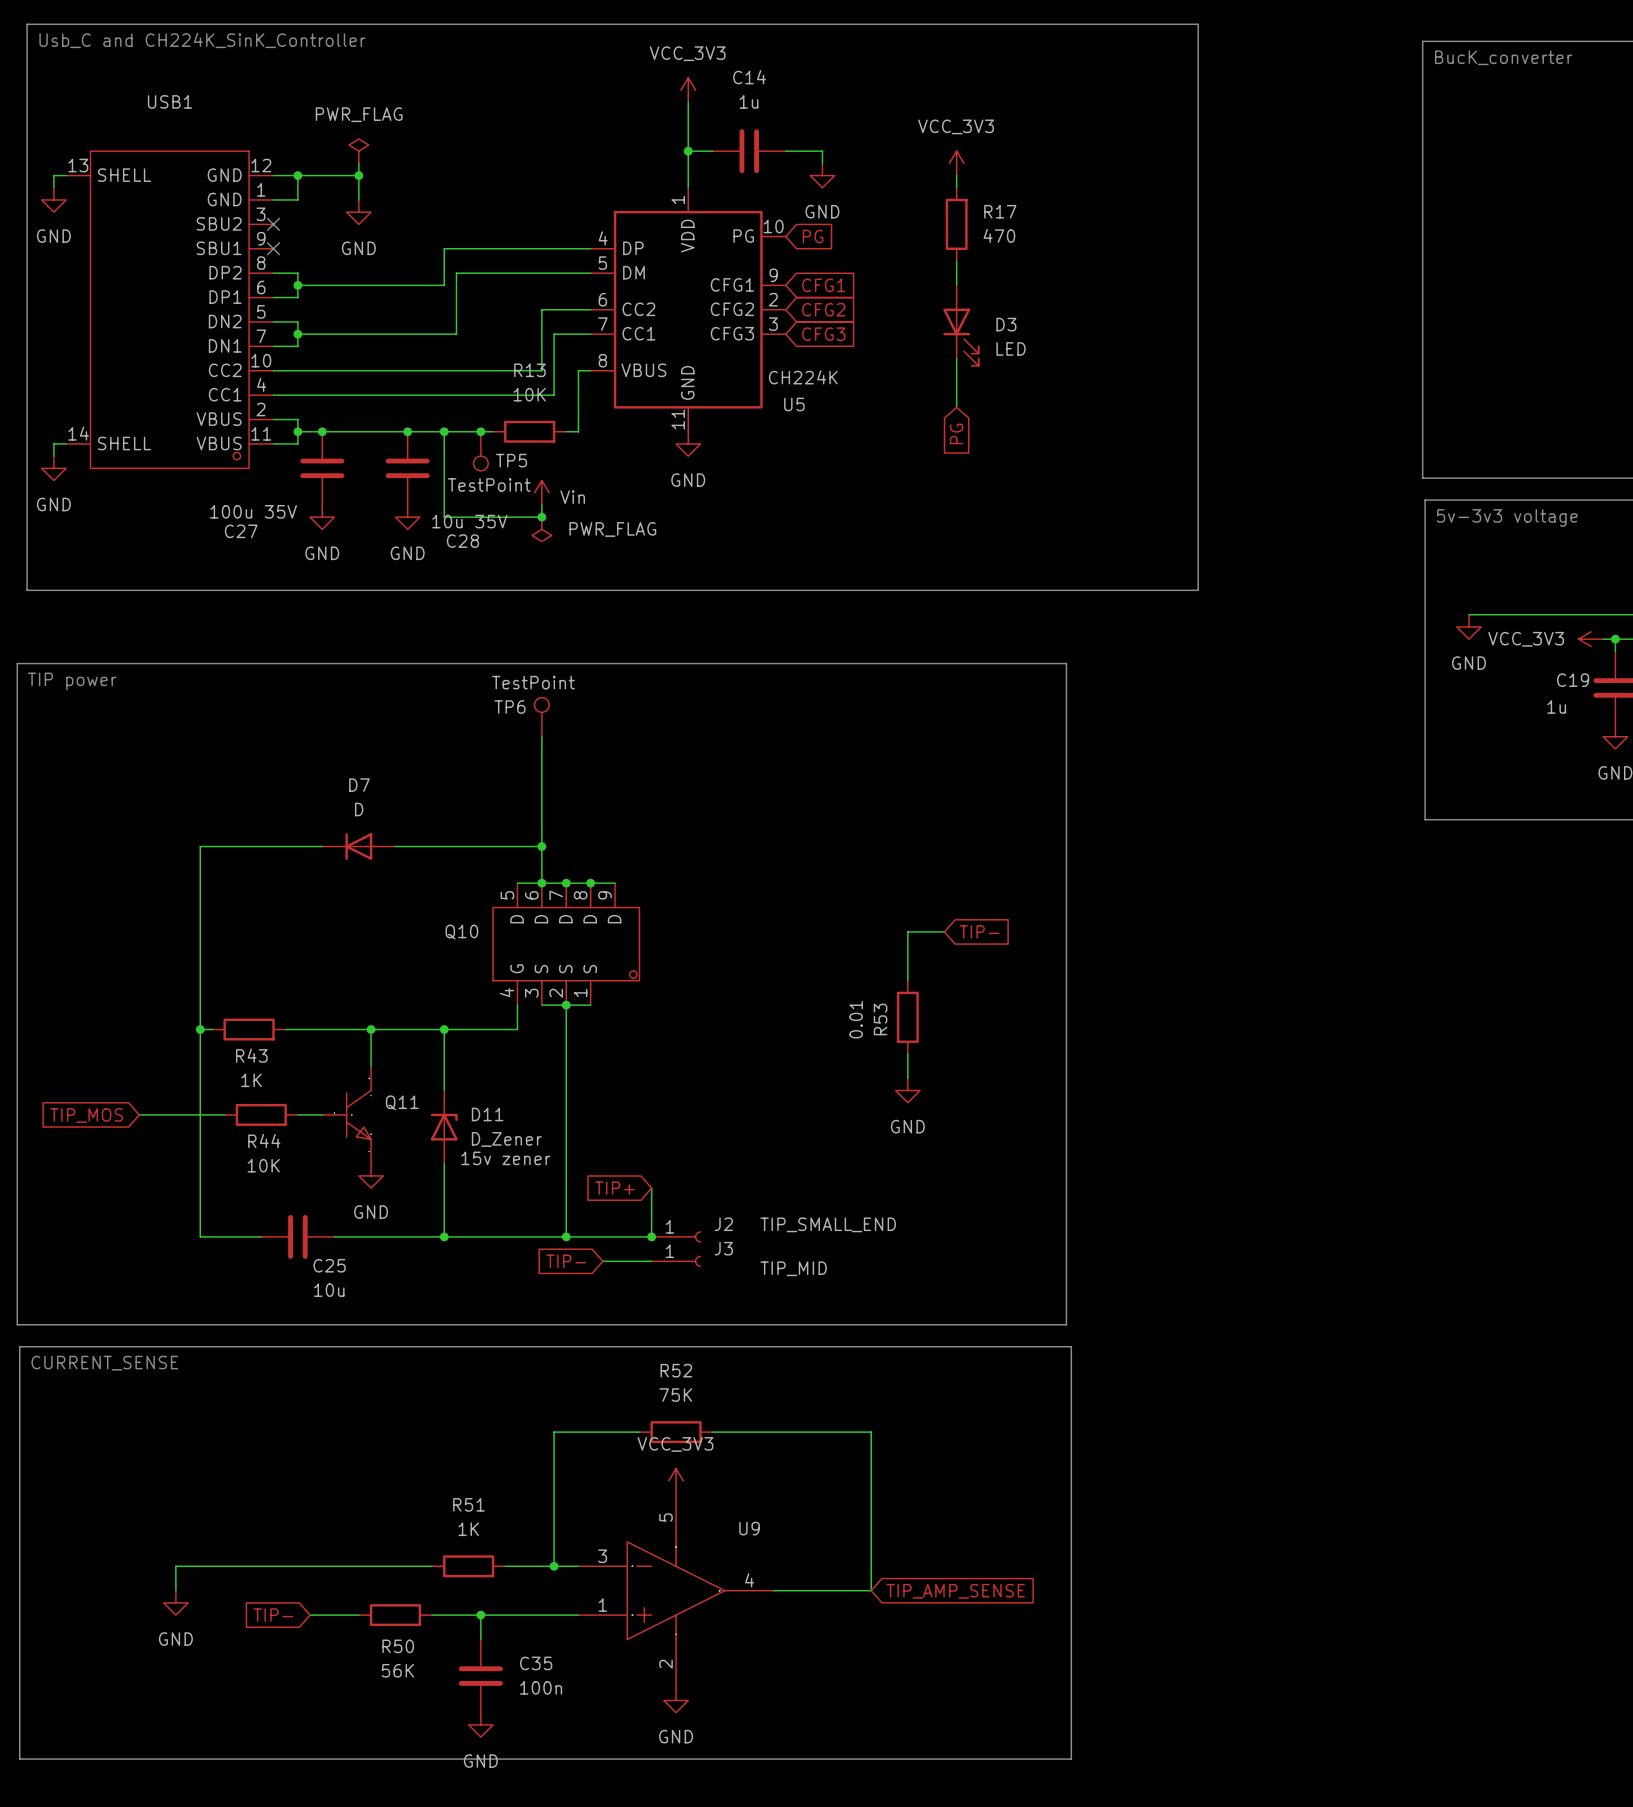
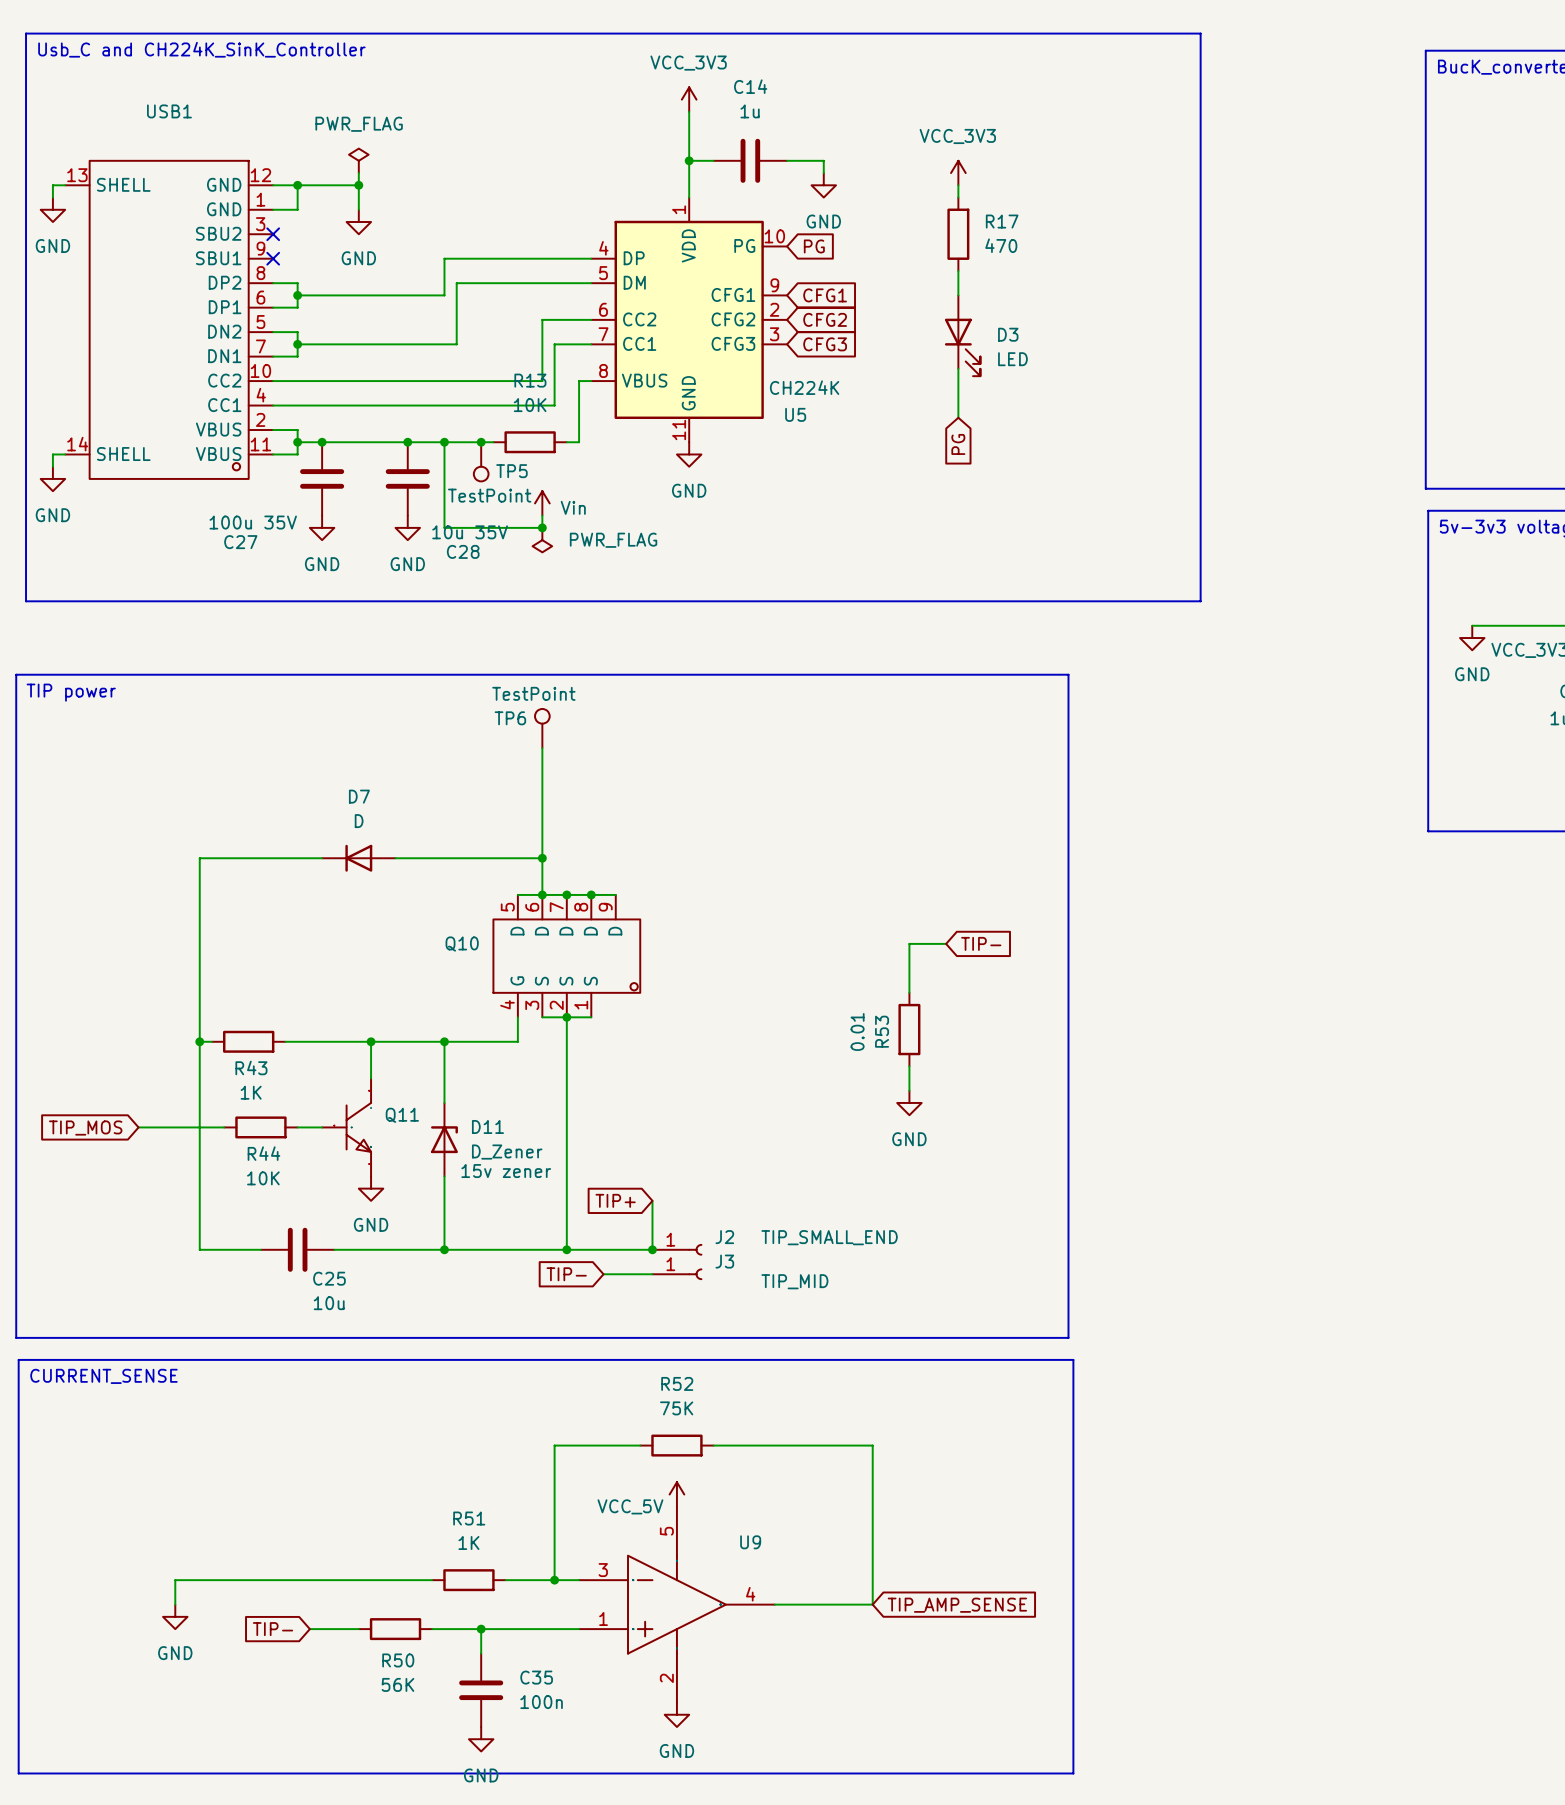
power symbol: VCC_3V3 (676, 1480) -> VCC_5V (676, 1494)

